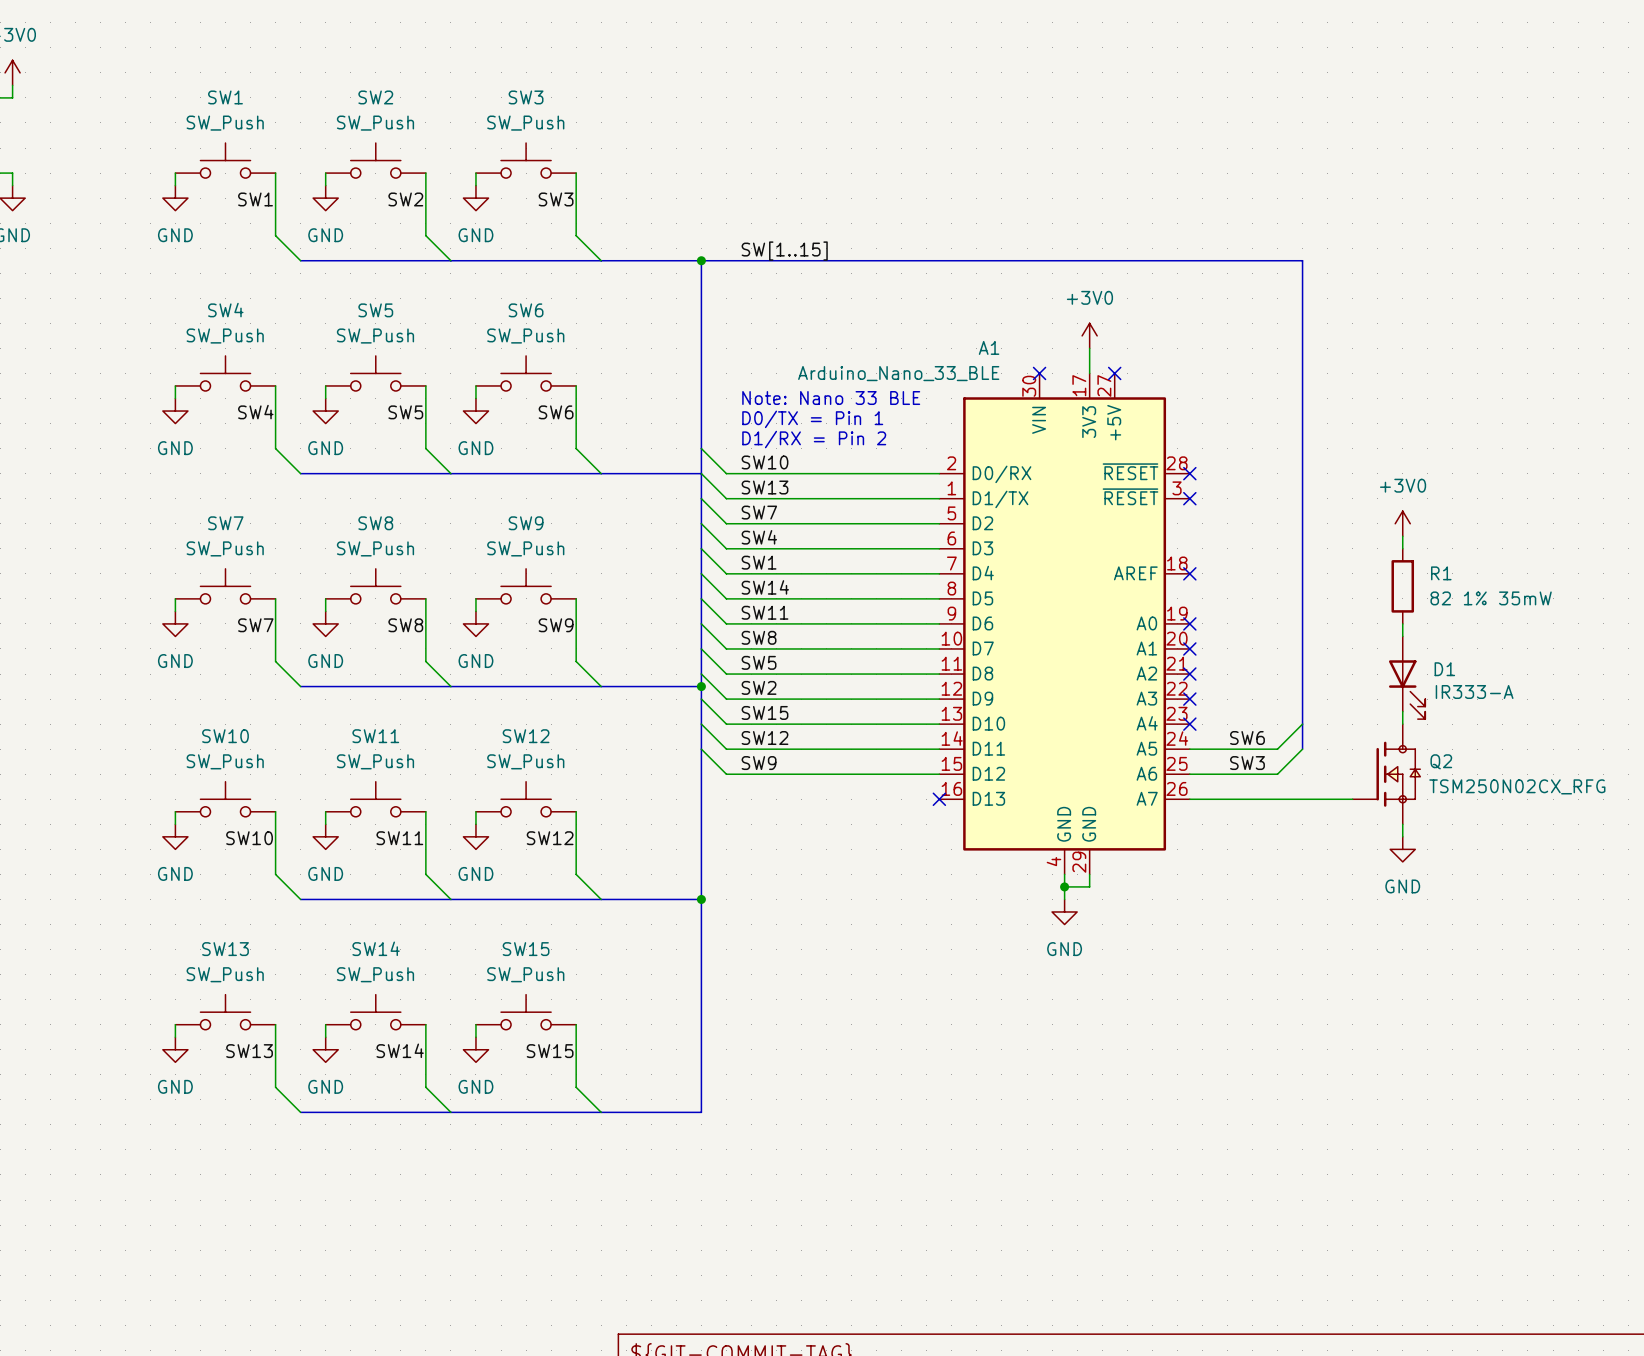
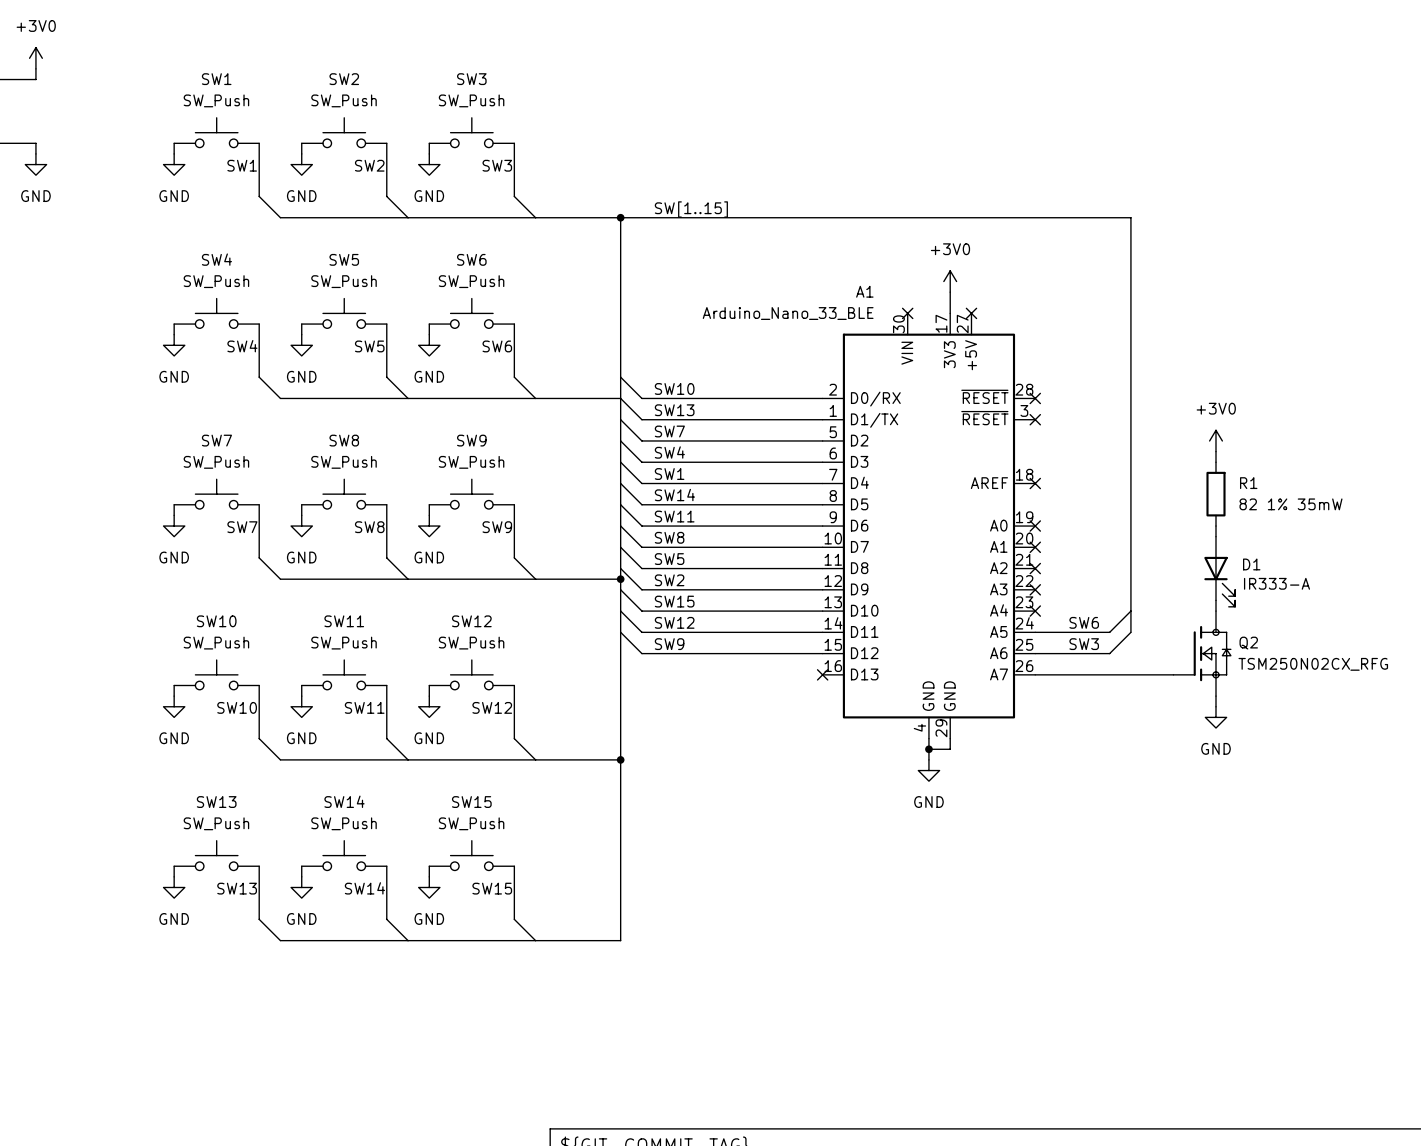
text: Note: Nano 33 BLE (831, 398) -> none
text: D0/TX = Pin 1 (812, 419) -> none
text: D1/RX = Pin 2 (814, 439) -> none

